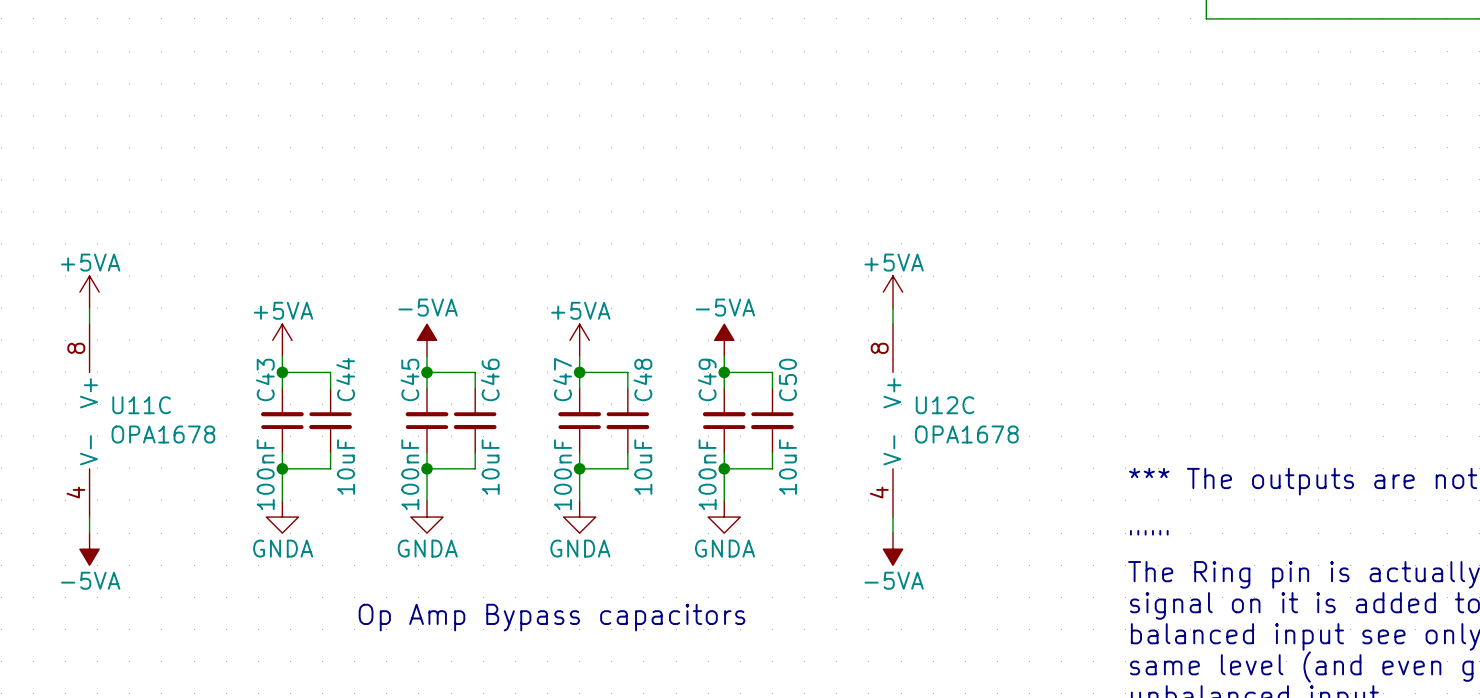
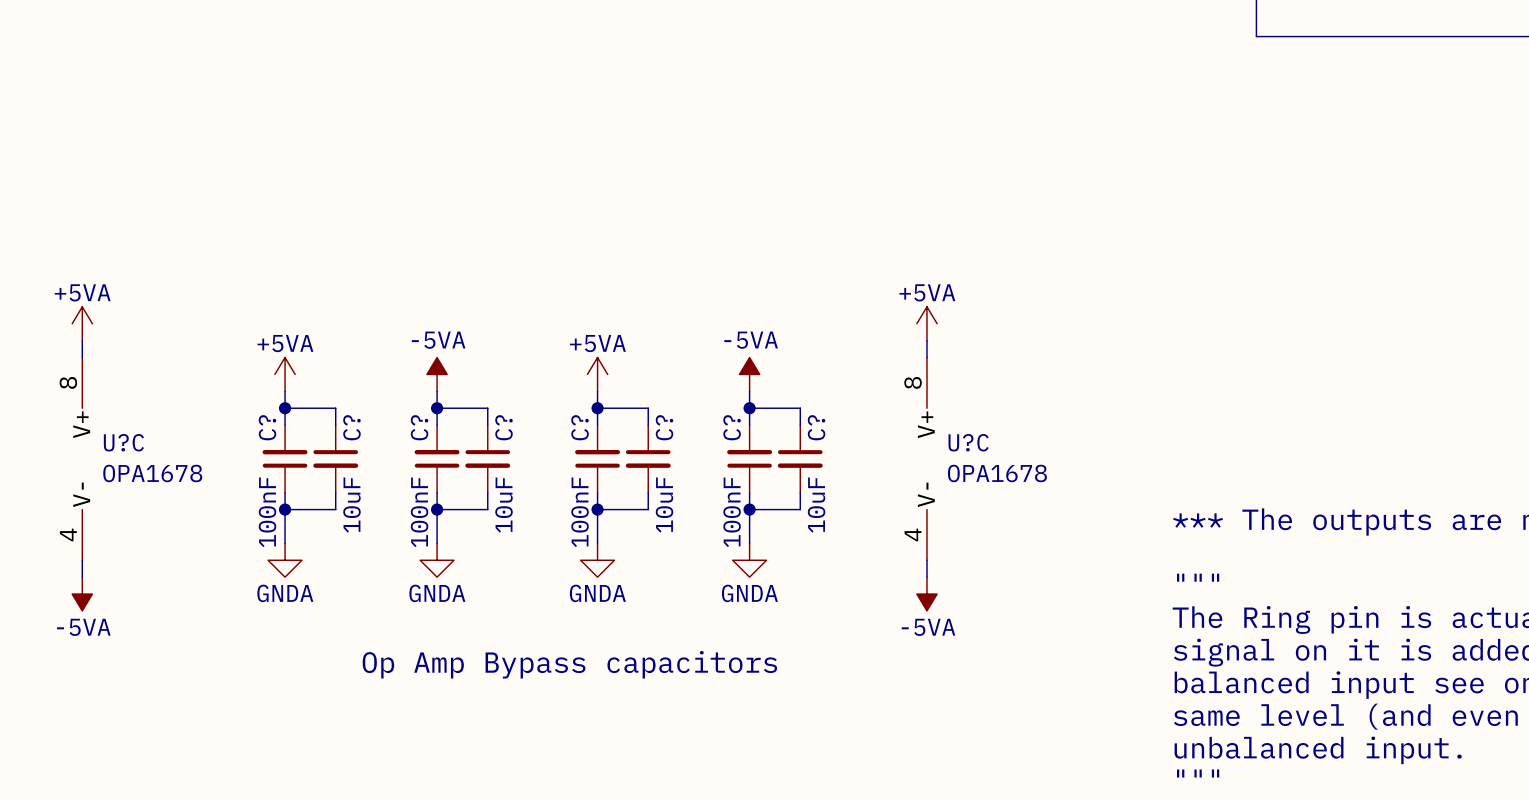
C43 name: C43 (265, 379) -> C? (267, 427)
C44 name: C44 (345, 379) -> C? (351, 427)
C45 name: C45 (409, 379) -> C? (419, 427)
C46 name: C46 (490, 379) -> C? (504, 427)
C47 name: C47 (562, 379) -> C? (580, 427)
C48 name: C48 (642, 379) -> C? (664, 427)
C49 name: C49 (707, 379) -> C? (732, 427)
C50 name: C50 (787, 379) -> C? (816, 427)
U11C name: U11C (141, 405) -> U?C (123, 442)
U12C name: U12C (945, 405) -> U?C (968, 442)

